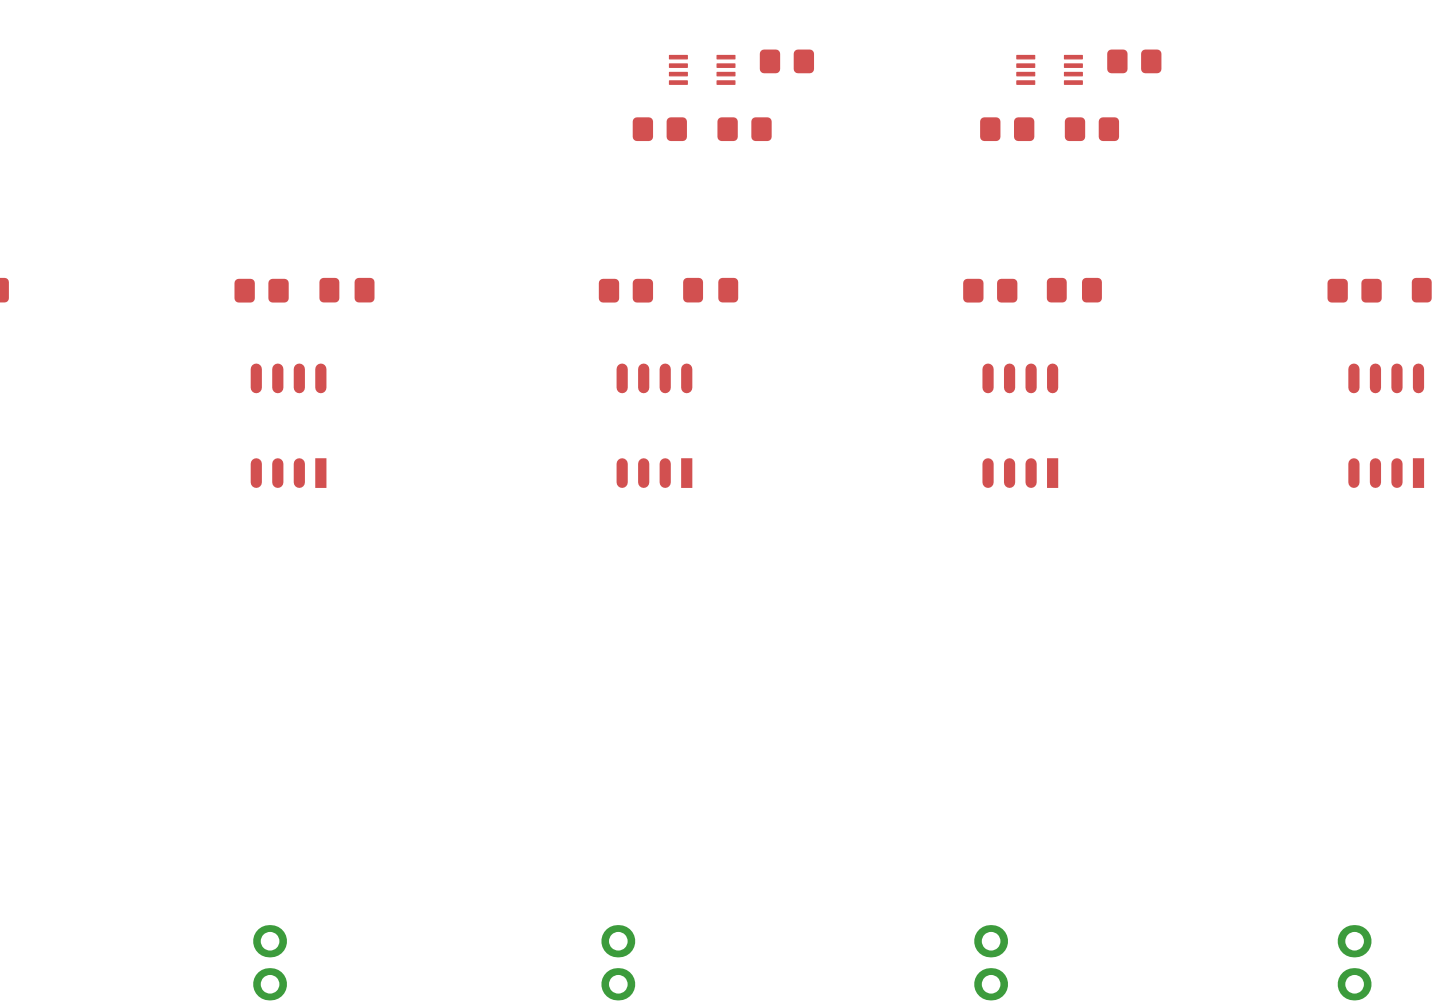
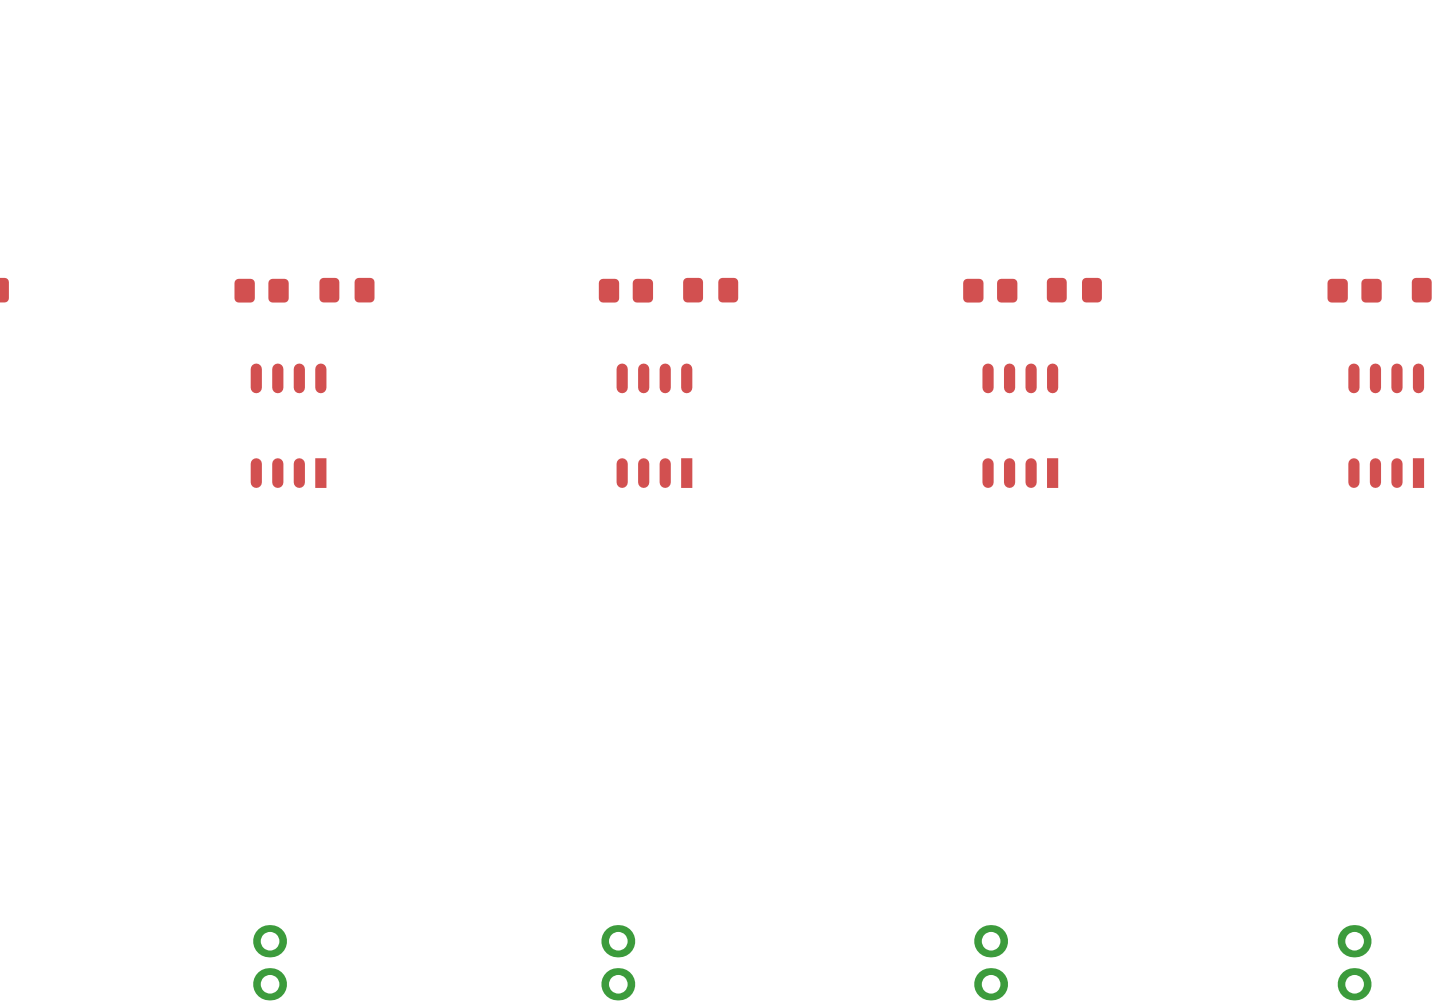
part: (786, 61) -> none
part: (1134, 61) -> none
part: (702, 69) -> none
part: (1049, 69) -> none
part: (659, 129) -> none
part: (744, 129) -> none
part: (1007, 129) -> none
part: (1091, 129) -> none

